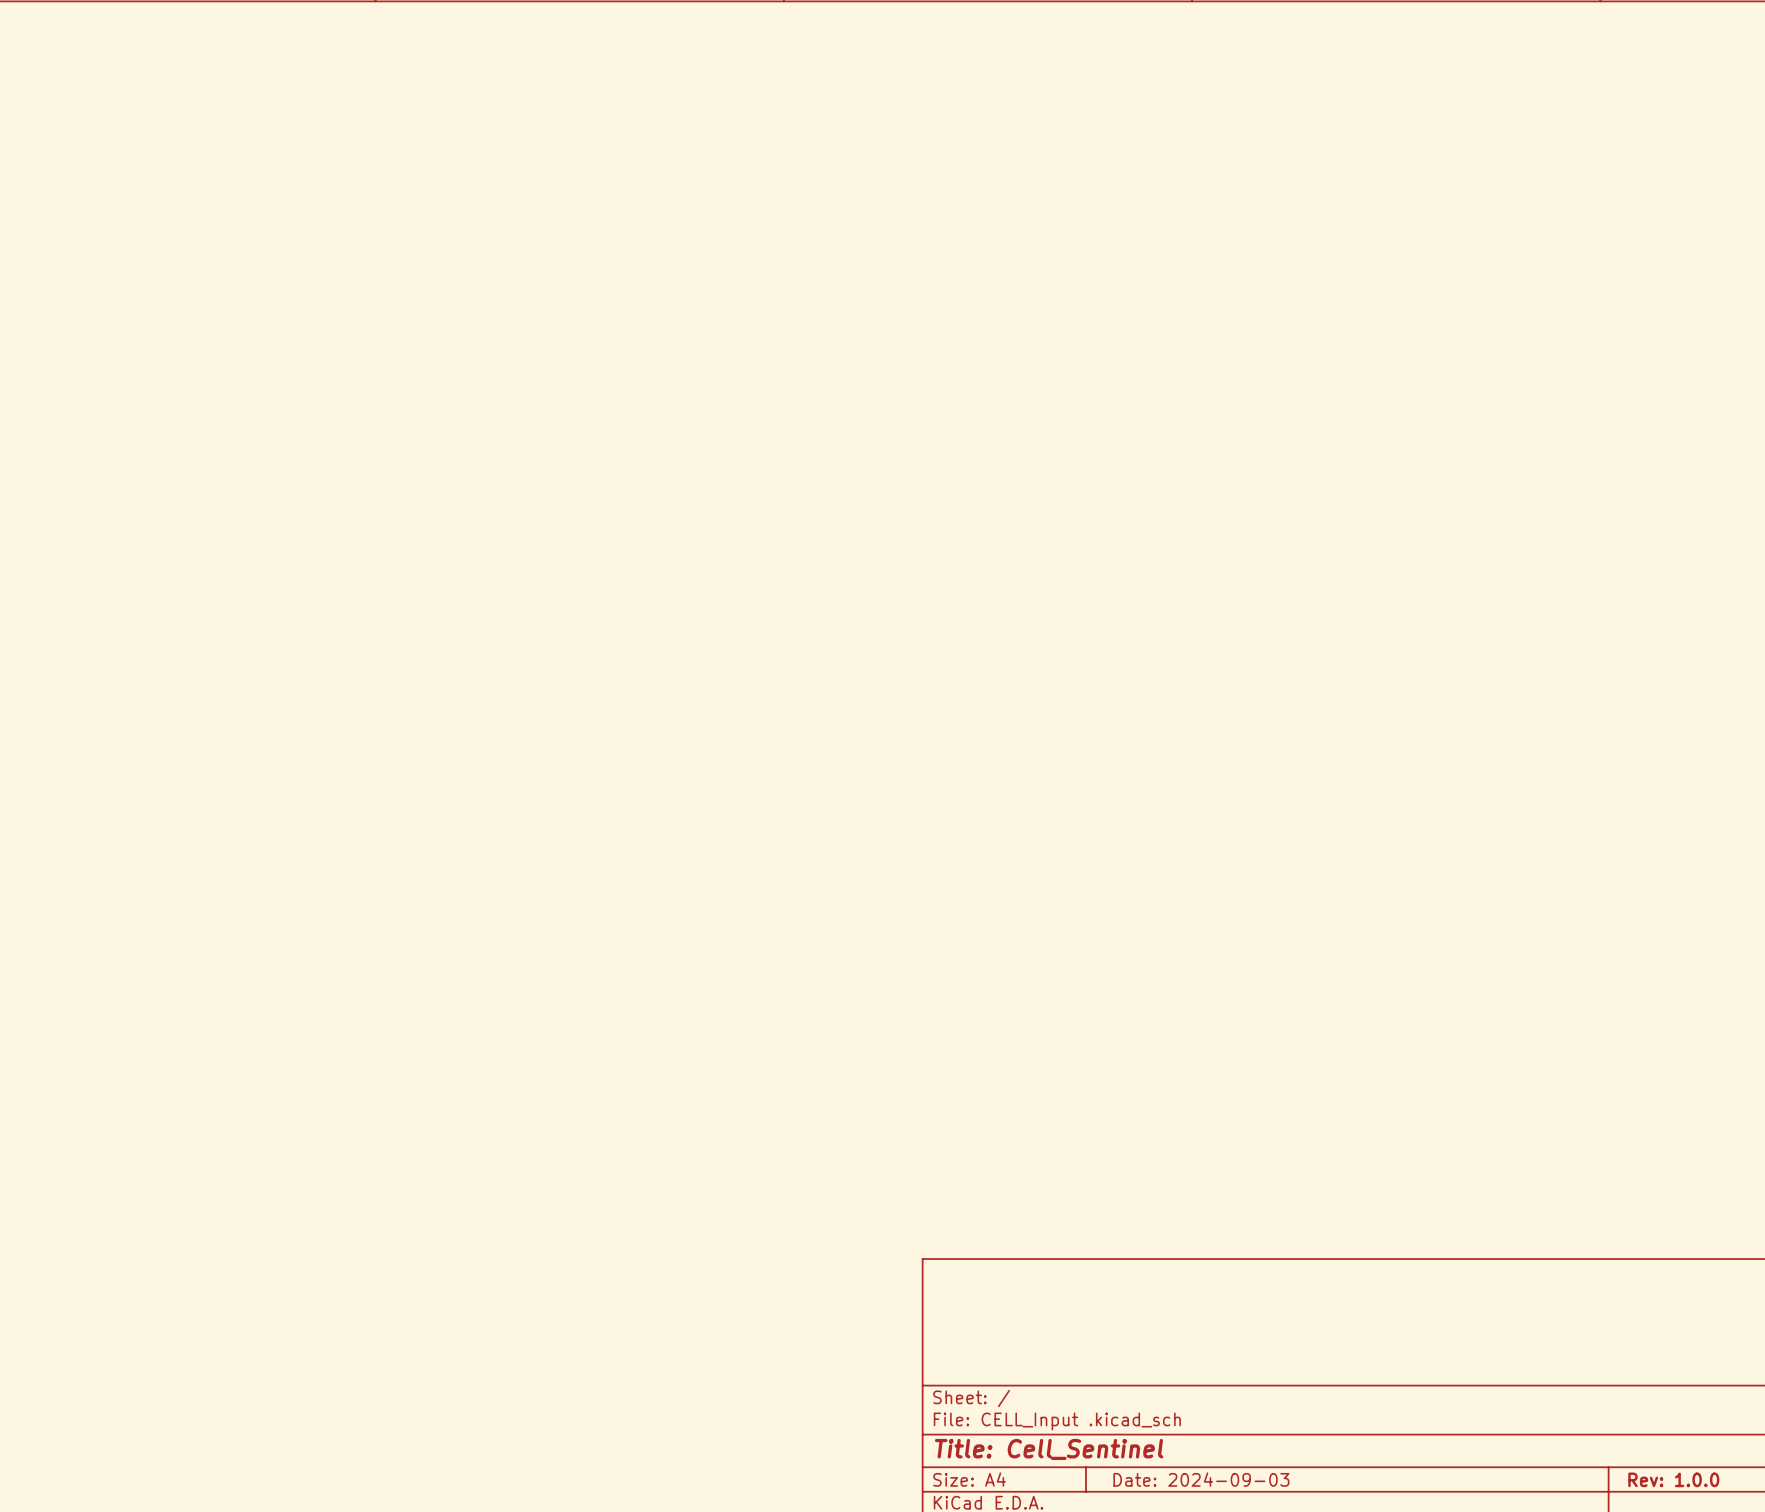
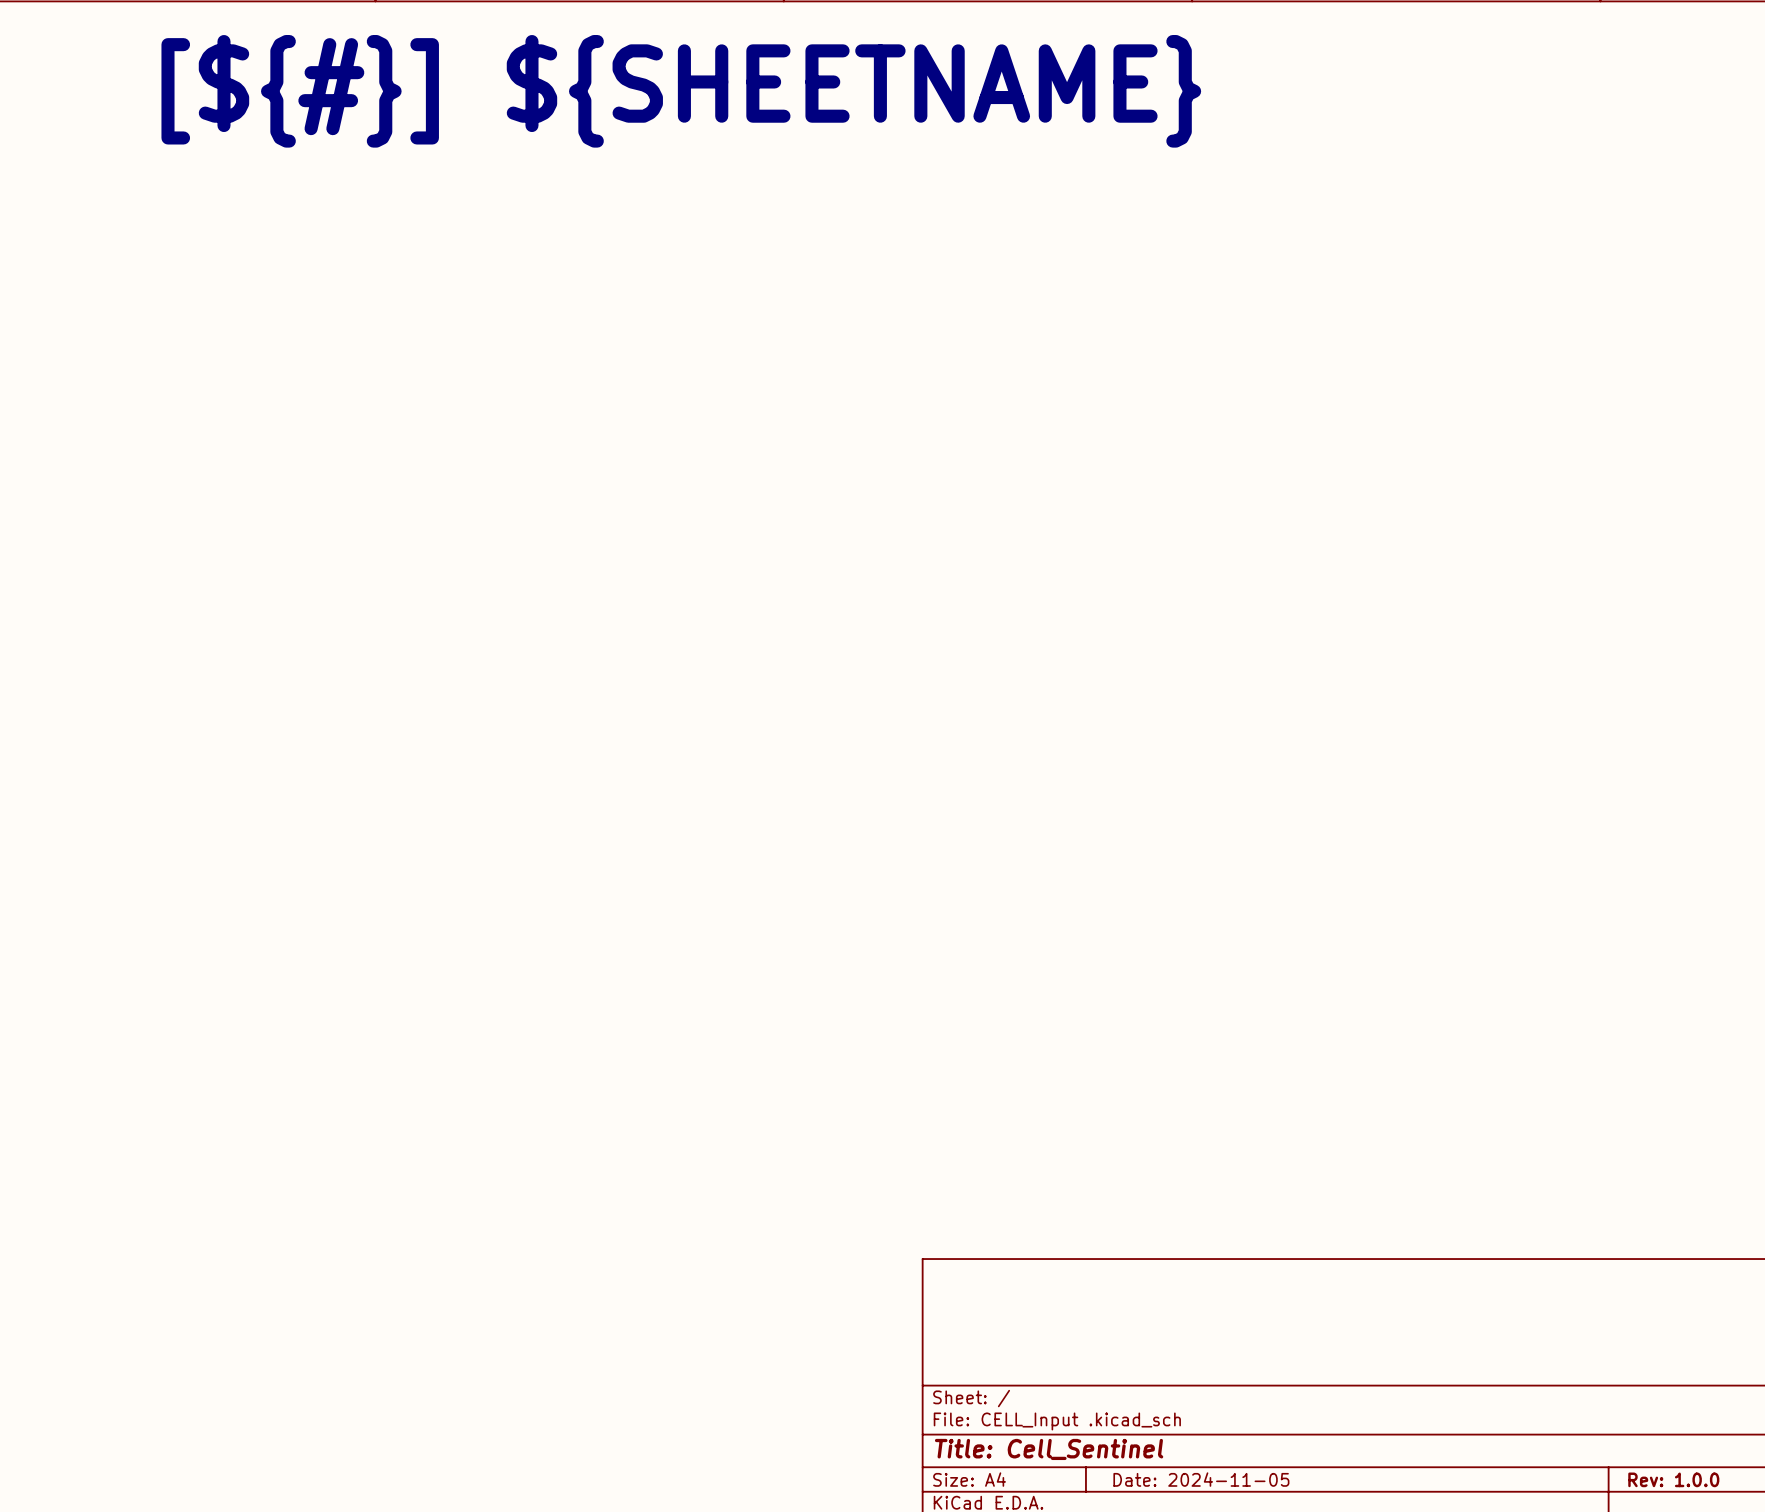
text: none -> [${#}] ${SHEETNAME} (681, 91)
title block: Date: 2024-09-03 (1201, 1479) -> Date: 2024-11-05 (1201, 1479)

